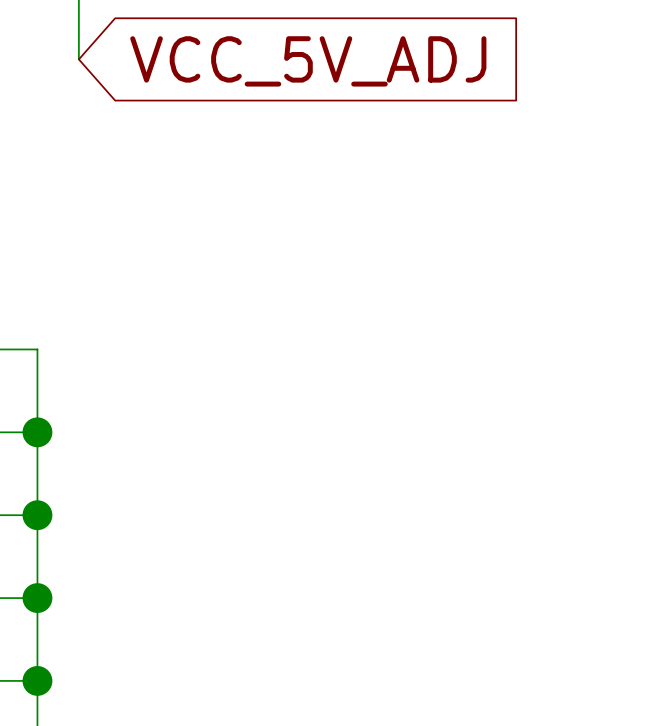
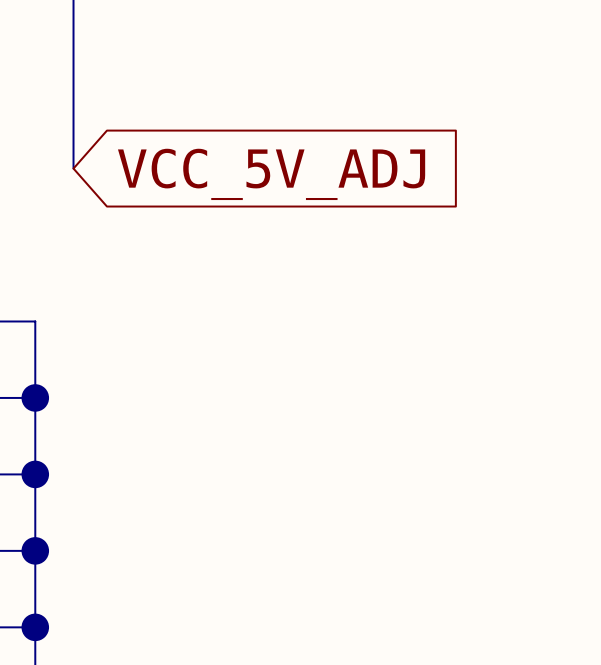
wire: none -> (73, 53) (73, 168)
global label position: VCC_5V_ADJ (308, 61) -> VCC_5V_ADJ (271, 174)

